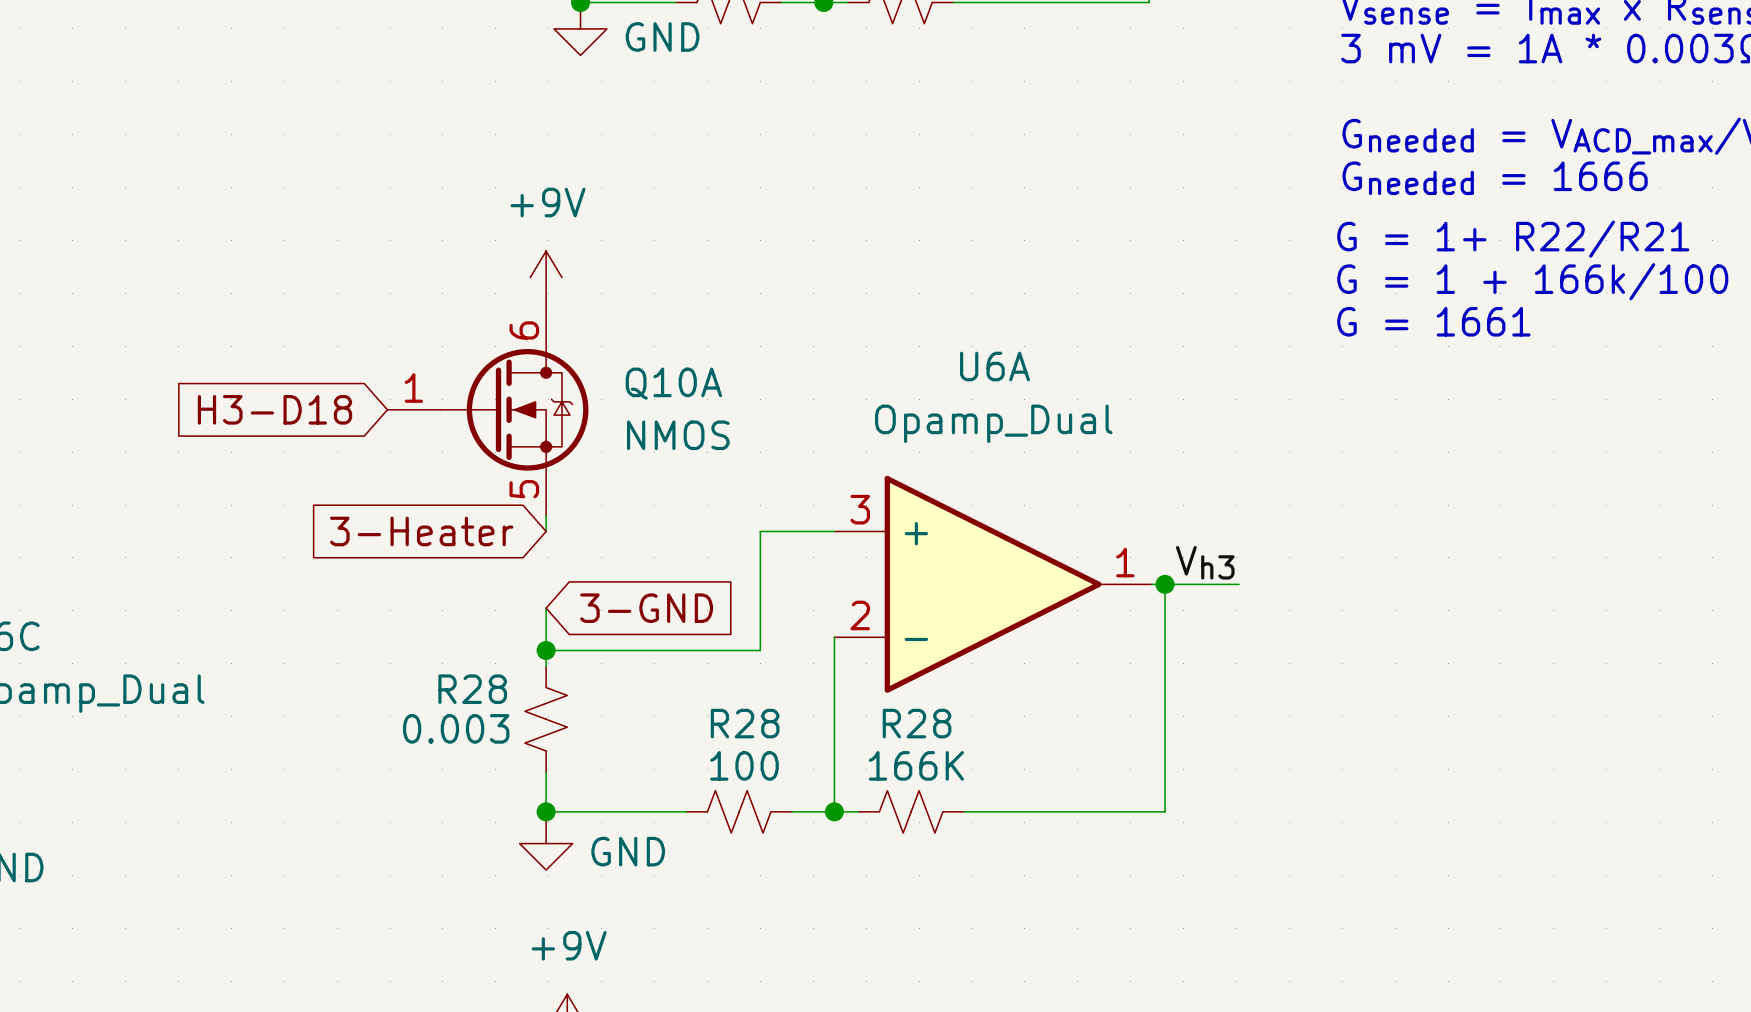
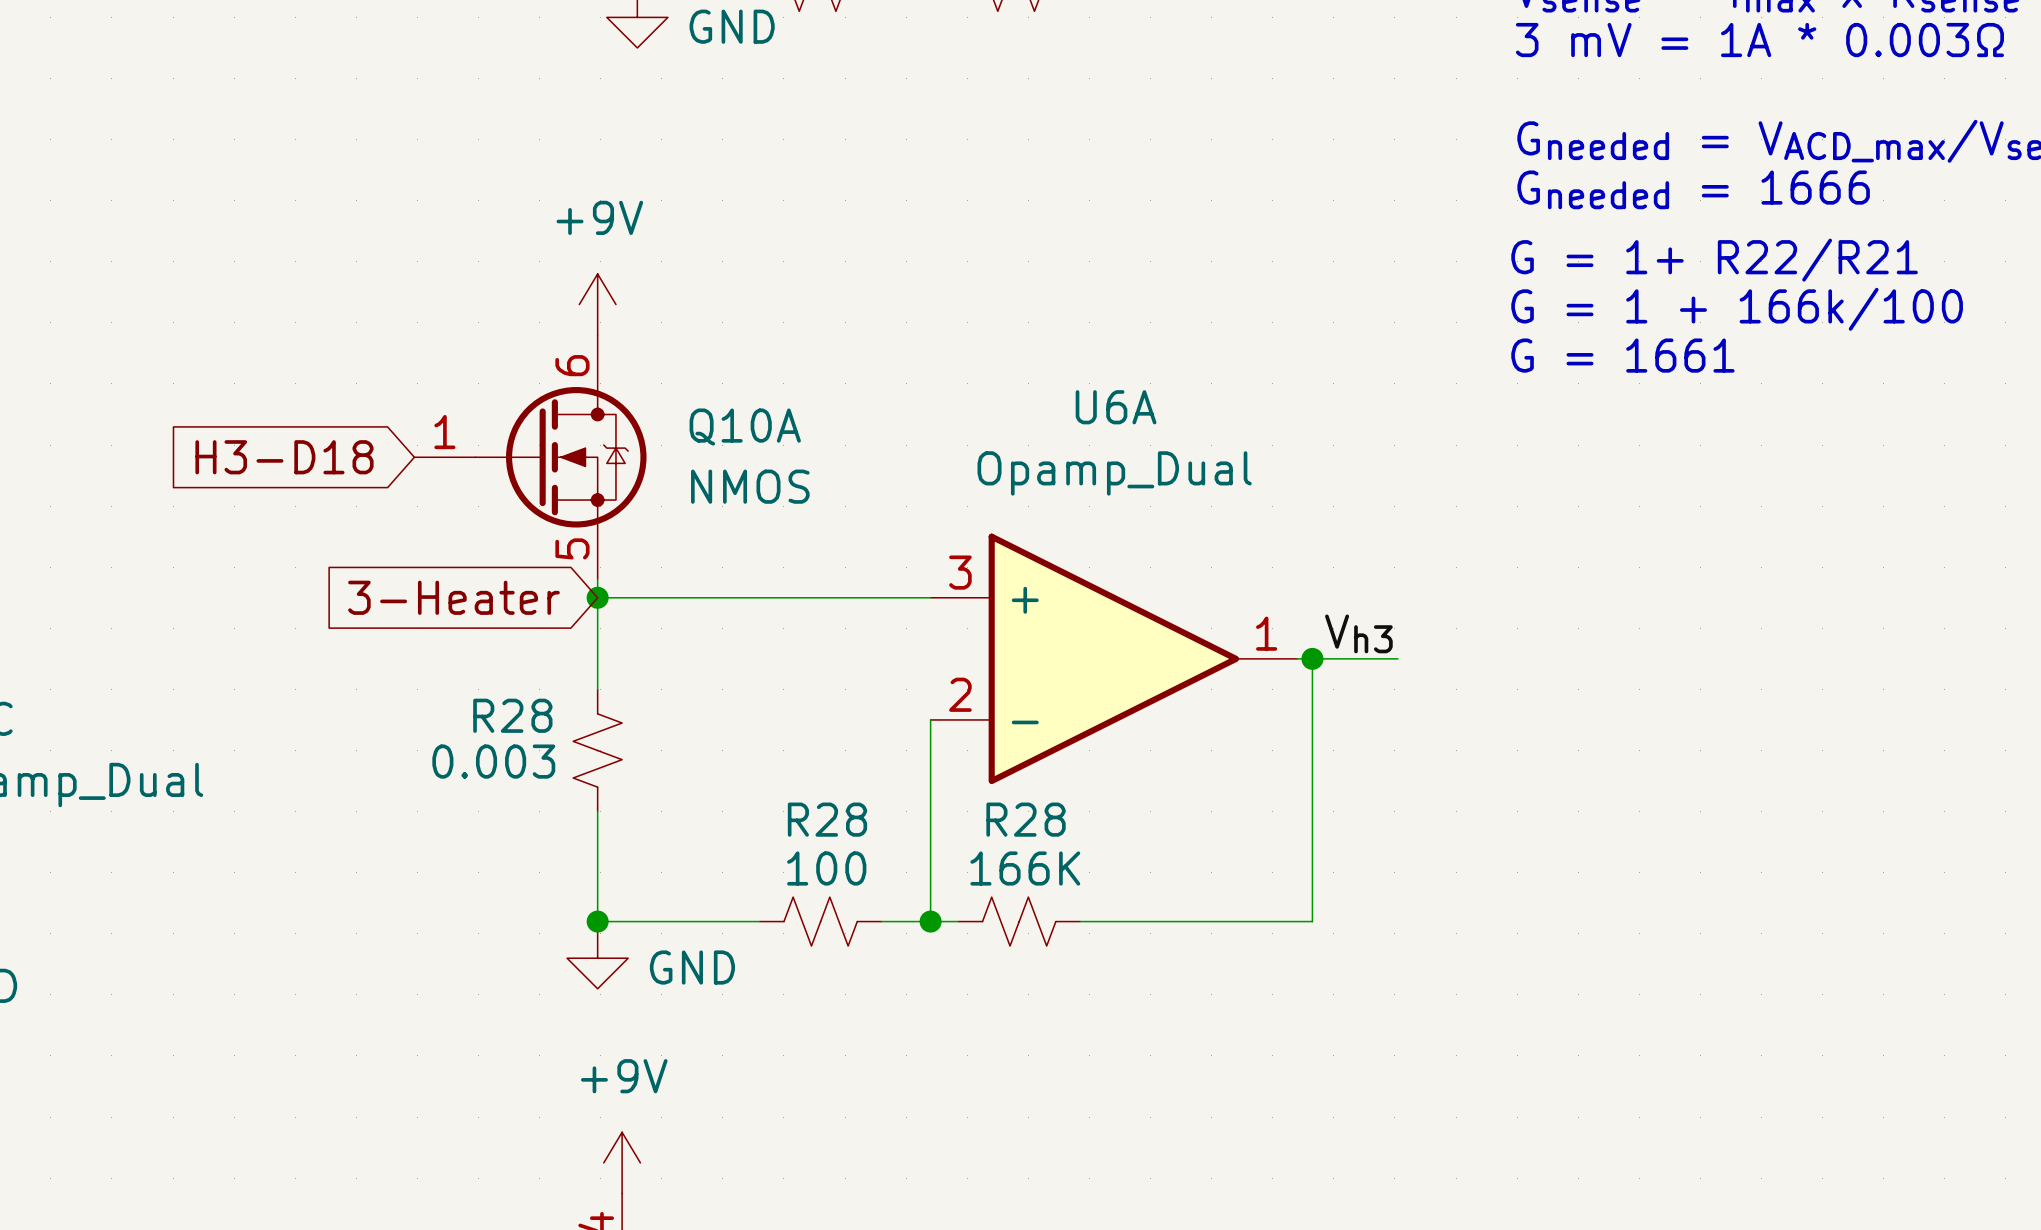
wire: (760, 531) (760, 650) (546, 650) -> (845, 597) (597, 597) (597, 686)
global label: 3-GND (646, 608) -> none
wire: (546, 610) (546, 666) -> (597, 811) (597, 875)
junction position: (546, 650) -> (597, 597)
R28 position: (546, 719) -> (597, 750)

